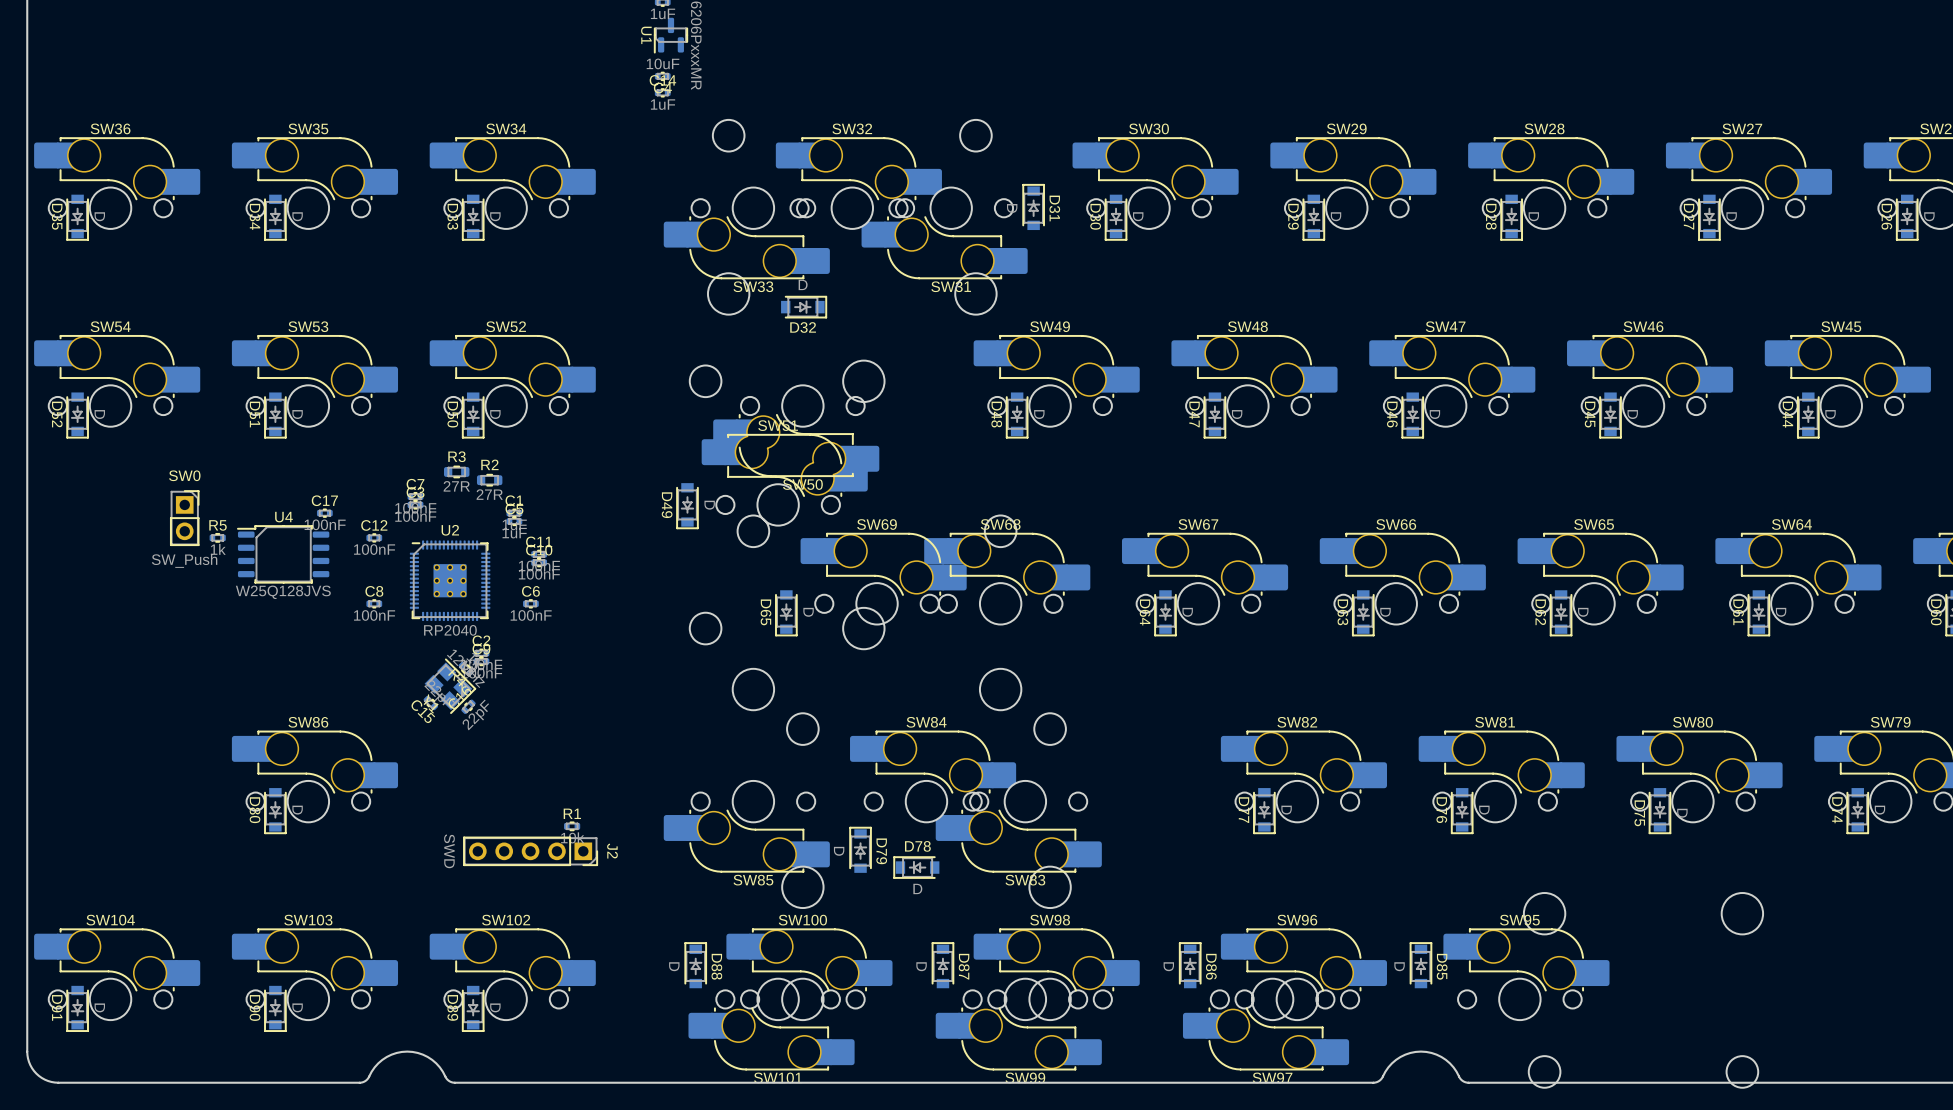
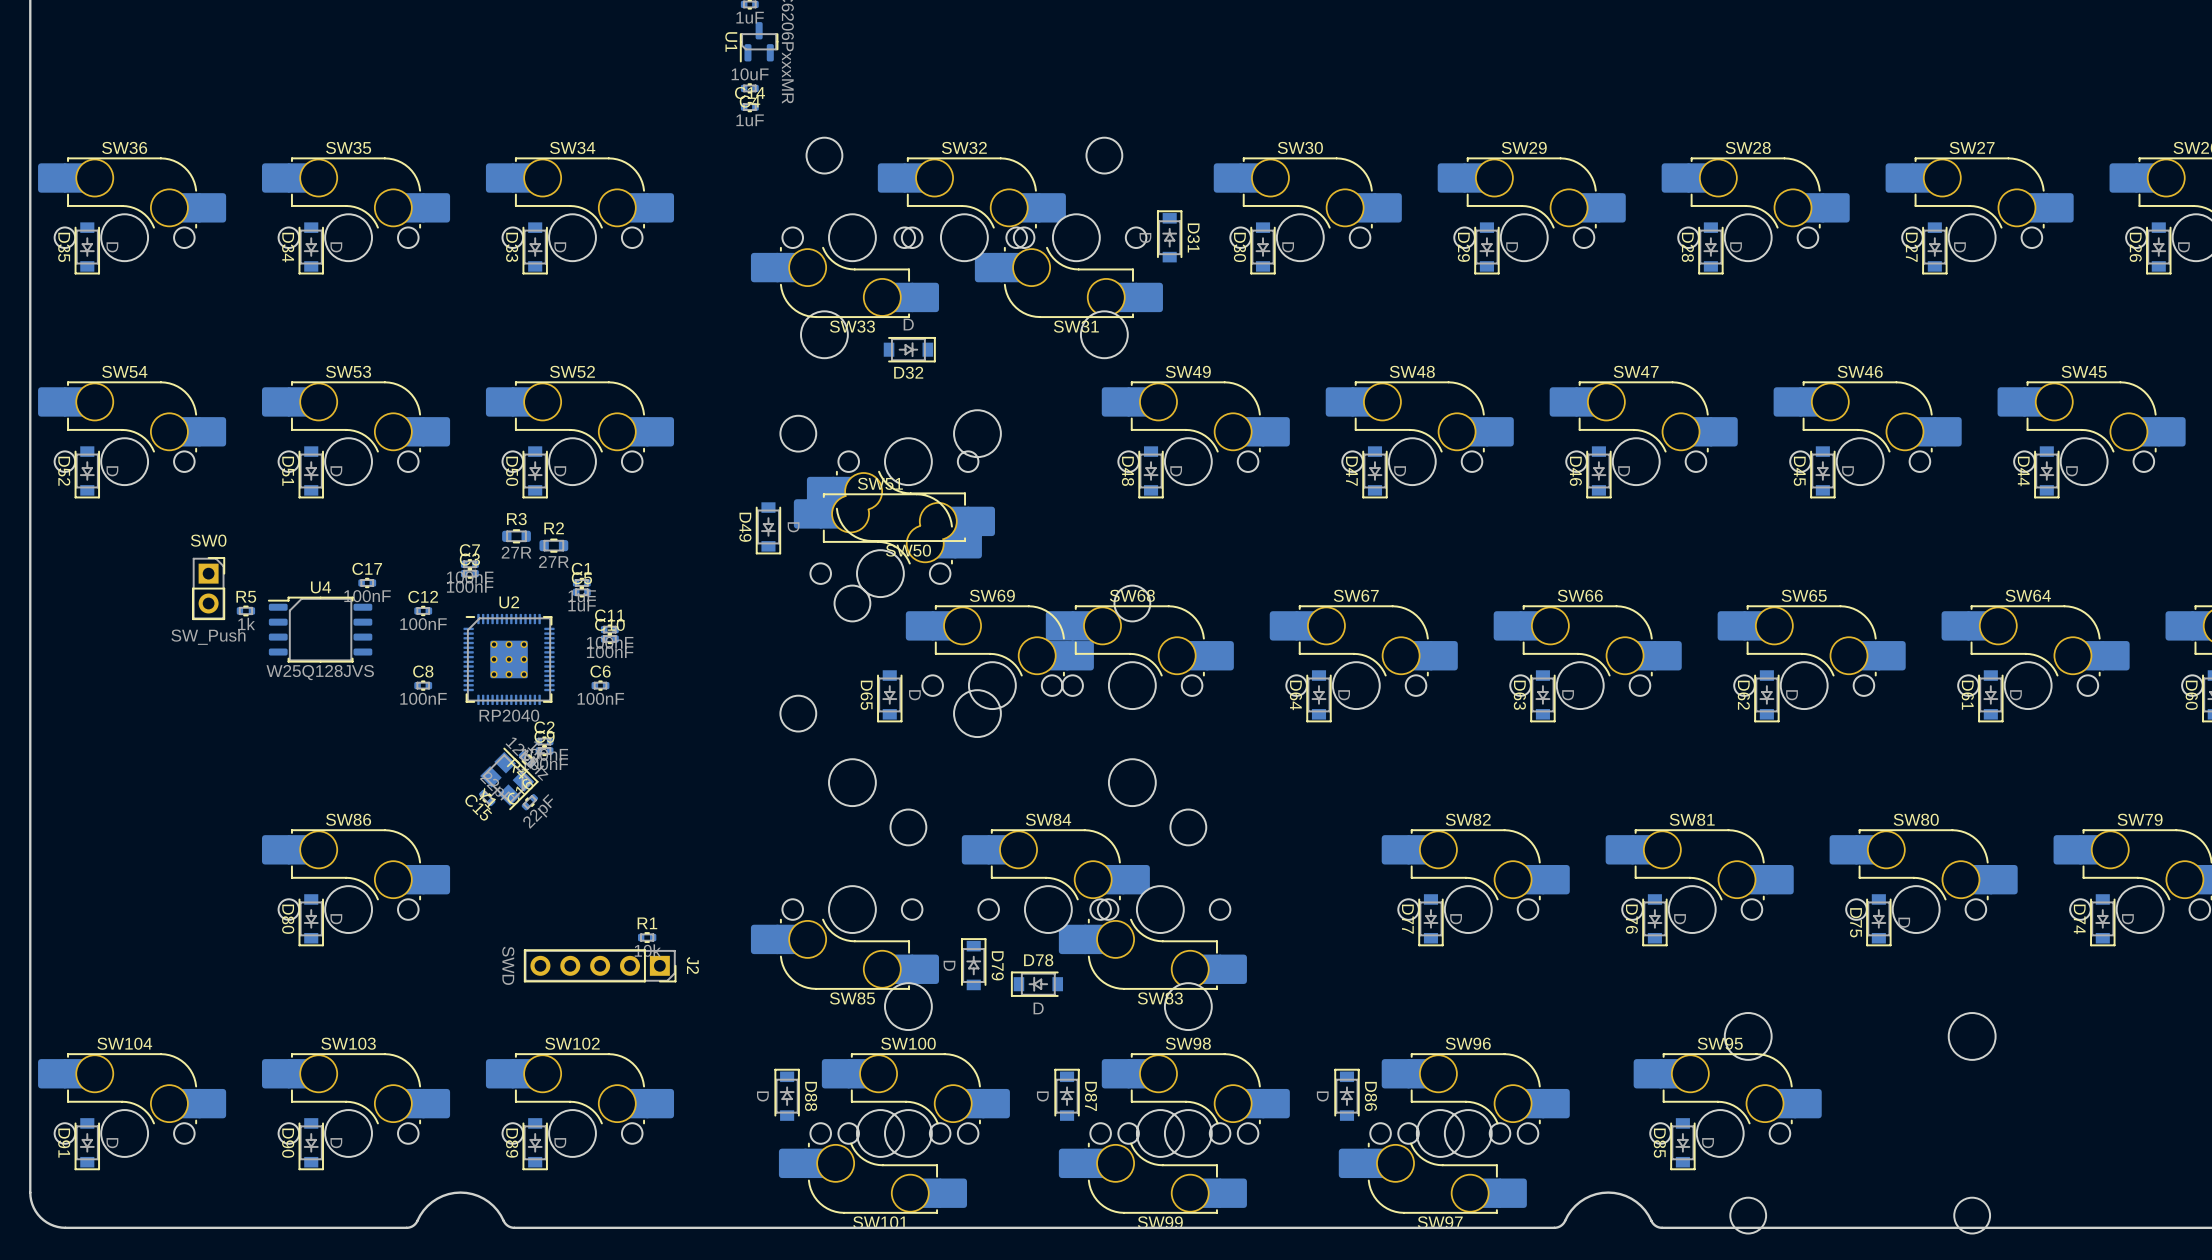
D49 position: (687, 506) -> (768, 528)
D85 rotation: 0° (1420, 965) -> 180° (1682, 1144)
D85 position: (1420, 965) -> (1682, 1144)

